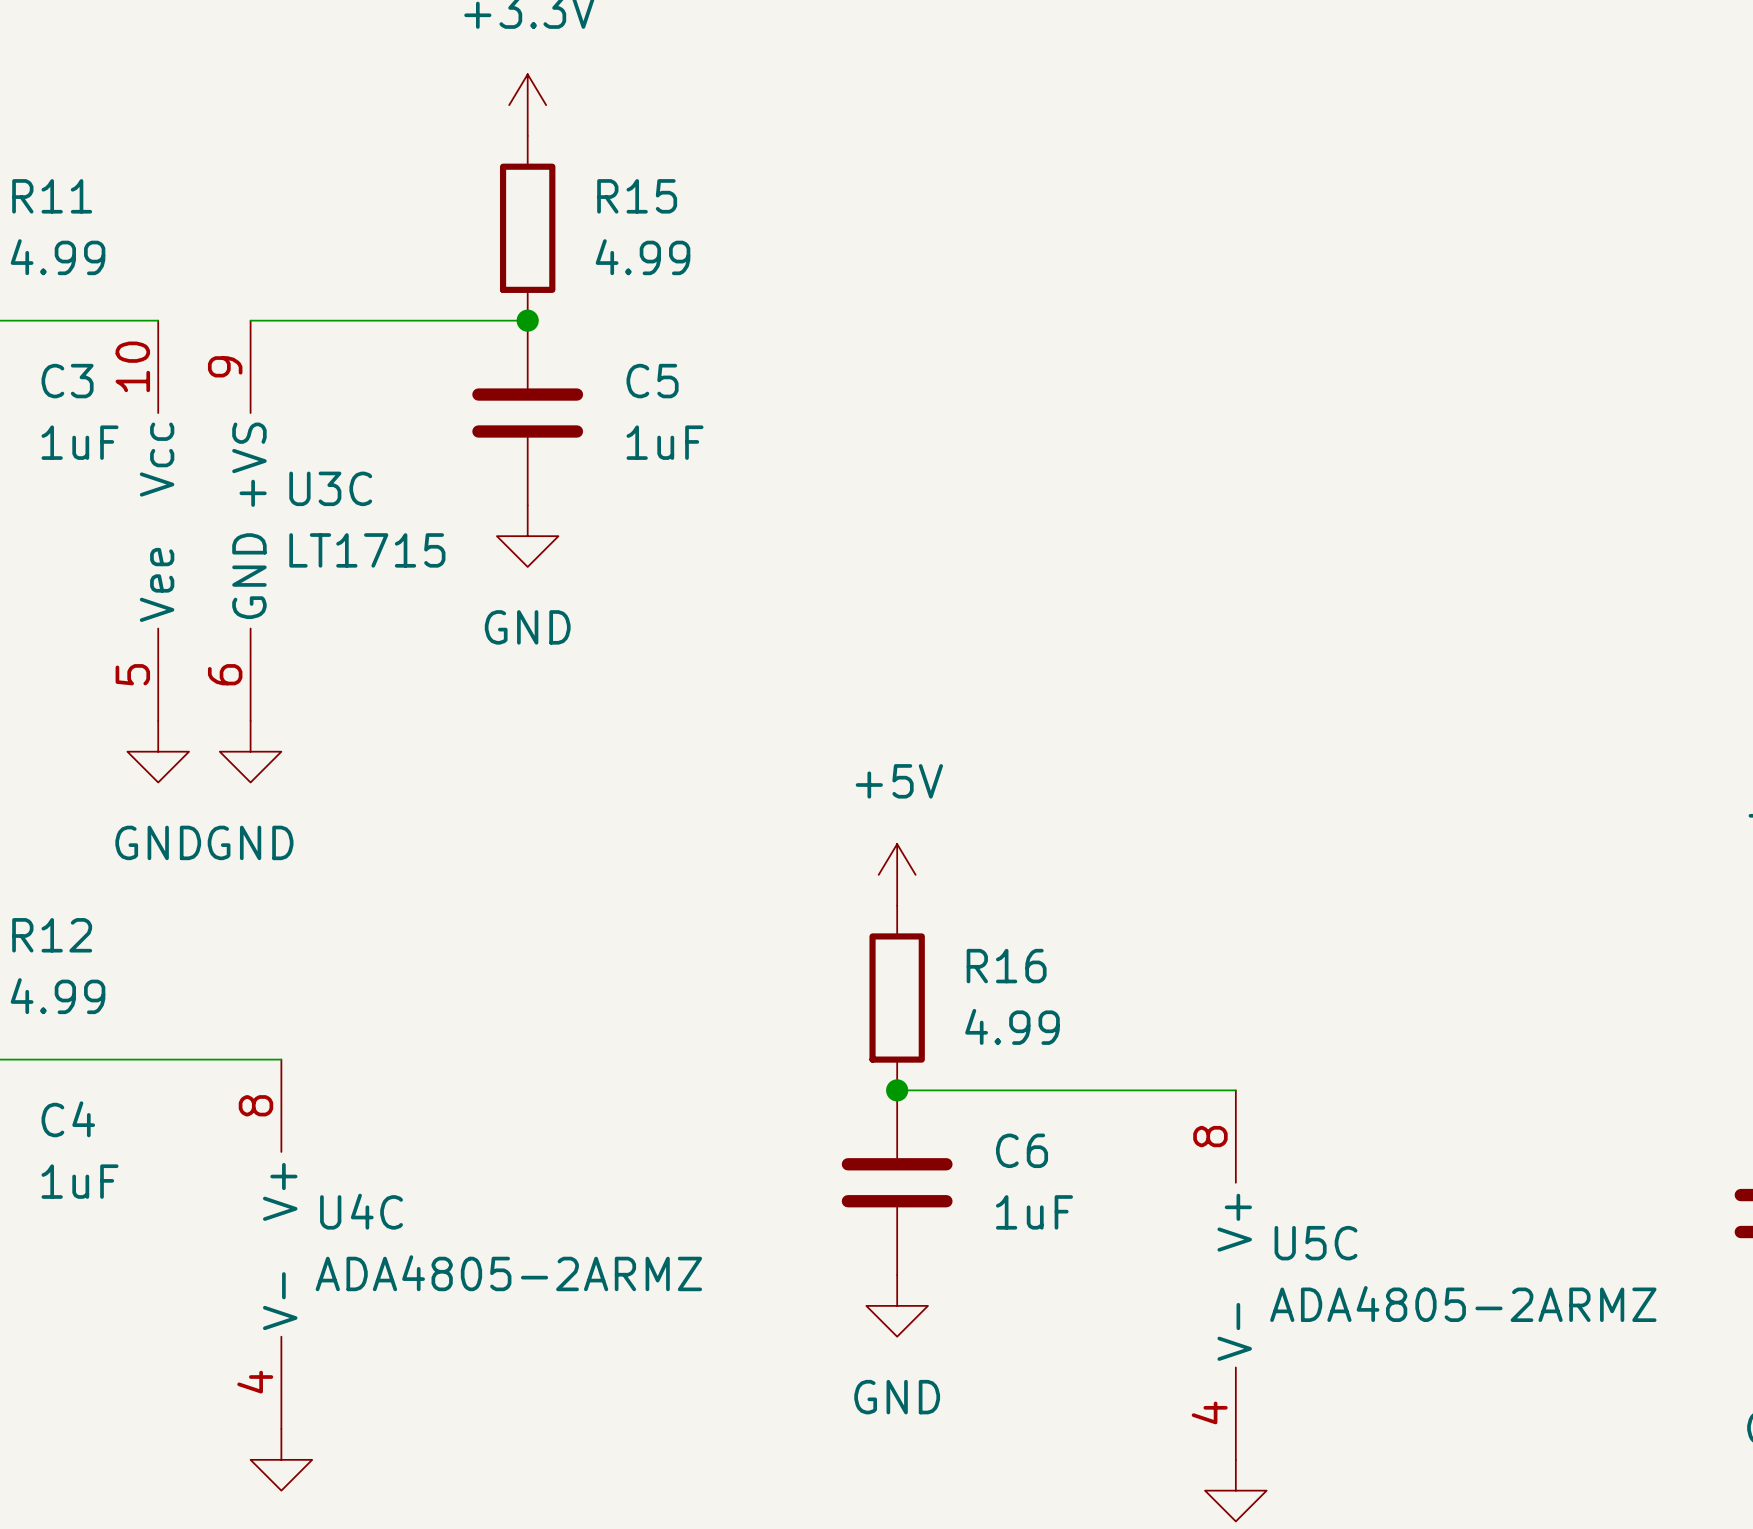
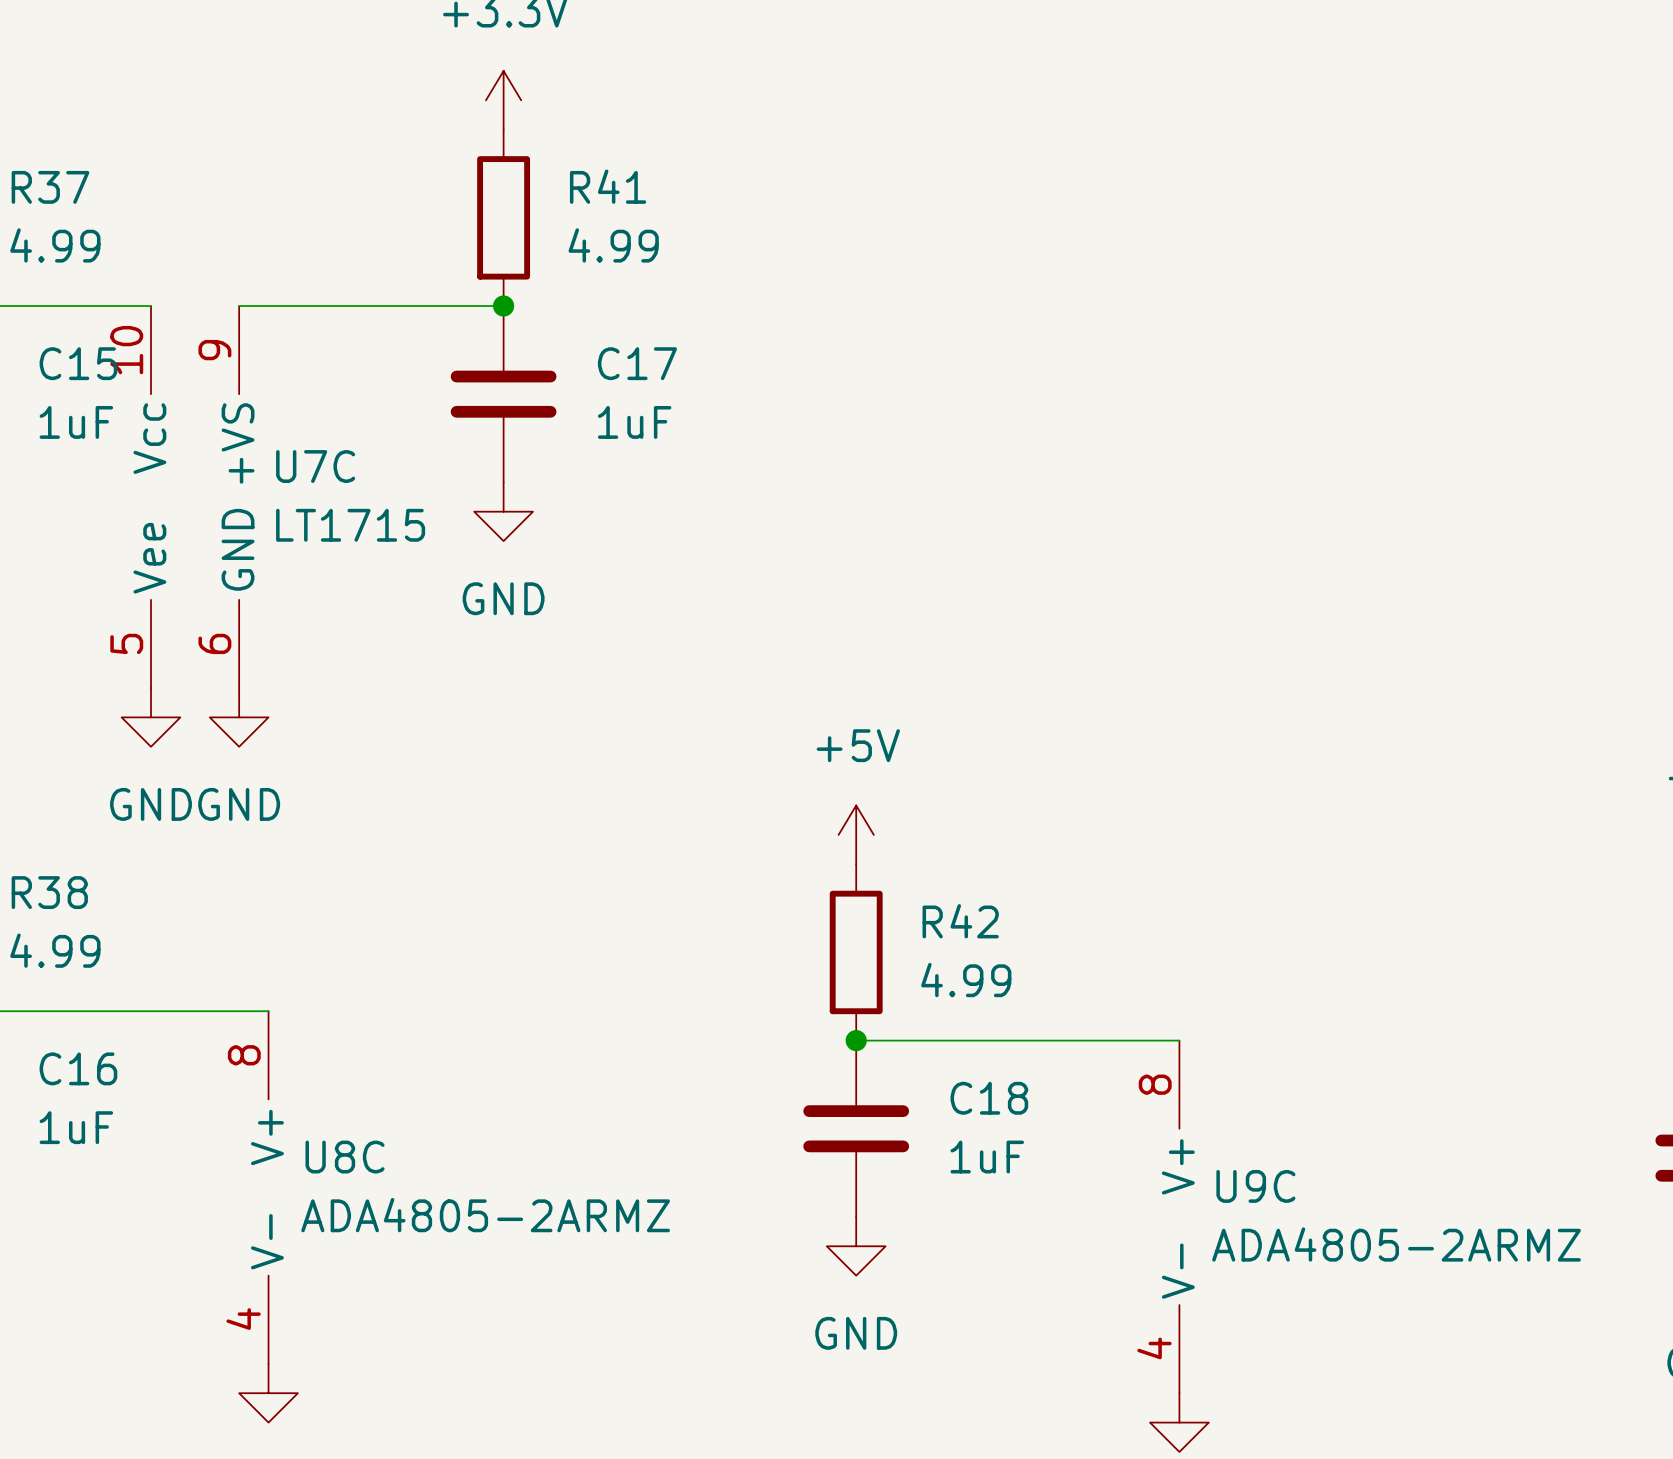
R11 name: R11 (52, 196) -> R37 (50, 187)
R15 name: R15 (637, 196) -> R41 (608, 186)
C3 name: C3 (67, 381) -> C15 (78, 363)
C5 name: C5 (652, 381) -> C17 (637, 363)
U3C name: U3C (330, 488) -> U7C (315, 466)
R12 name: R12 (52, 935) -> R38 (49, 892)
R16 name: R16 (1006, 966) -> R42 (960, 921)
C4 name: C4 (68, 1119) -> C16 (78, 1068)
C6 name: C6 (1022, 1150) -> C18 (989, 1098)
U4C name: U4C (361, 1211) -> U8C (345, 1157)
U5C name: U5C (1315, 1243) -> U9C (1255, 1186)

